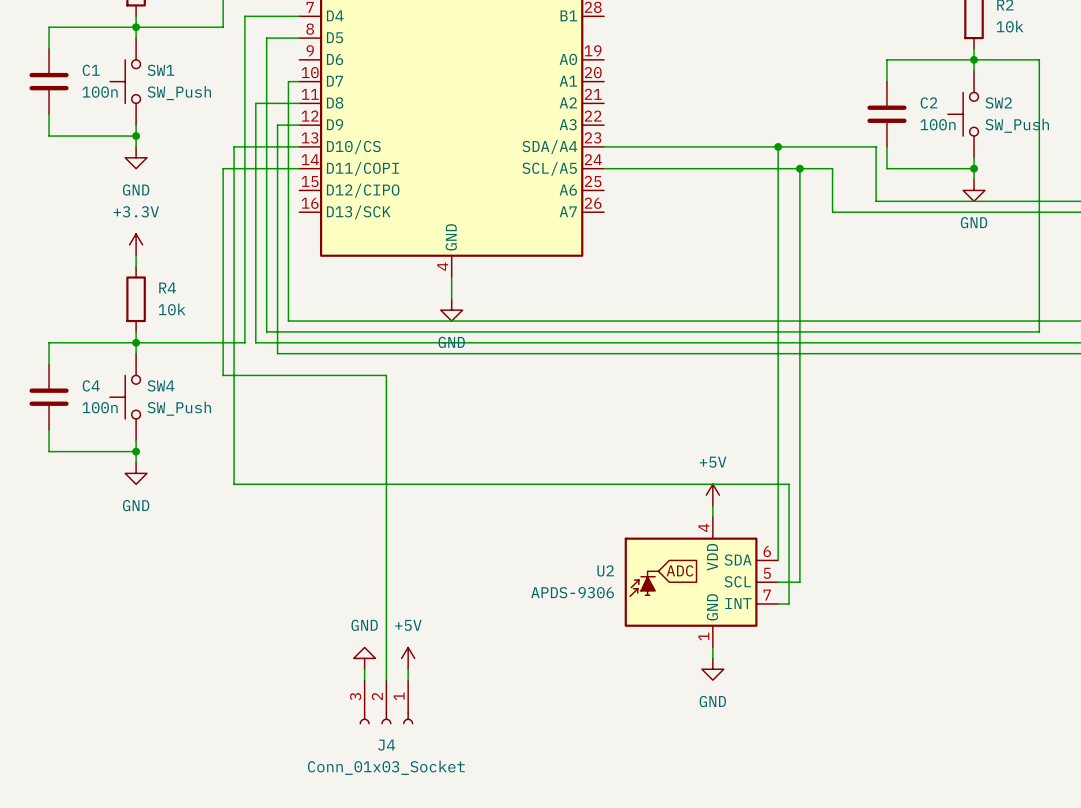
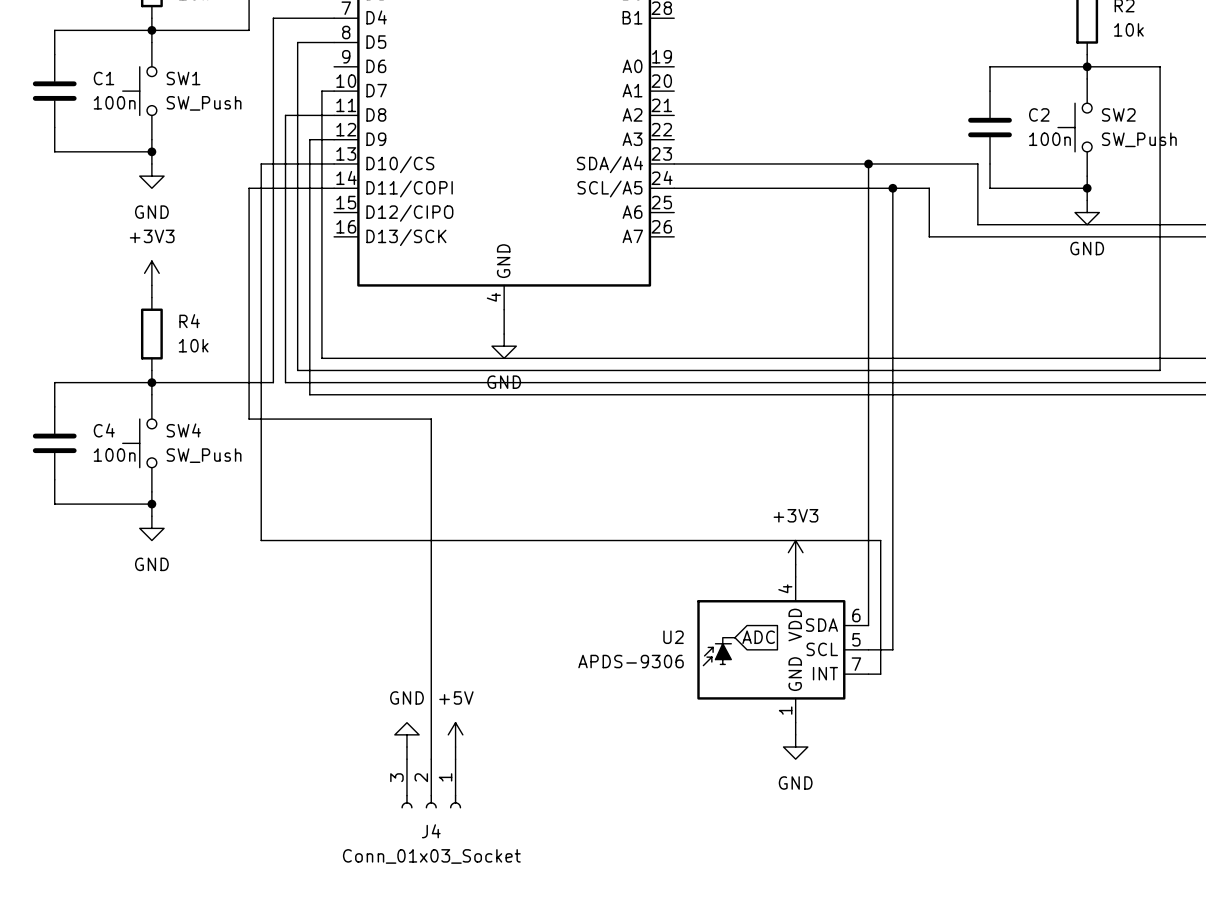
power symbol: +3.3V (136, 244) -> +3V3 (151, 273)
power symbol: +5V (712, 495) -> +3V3 (795, 552)

